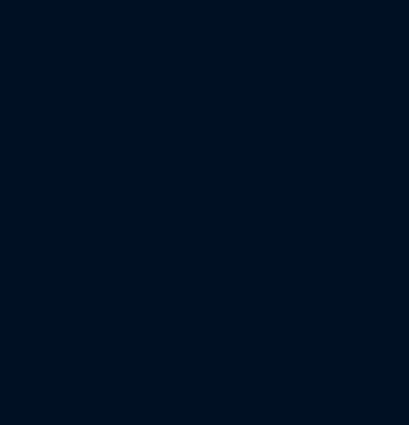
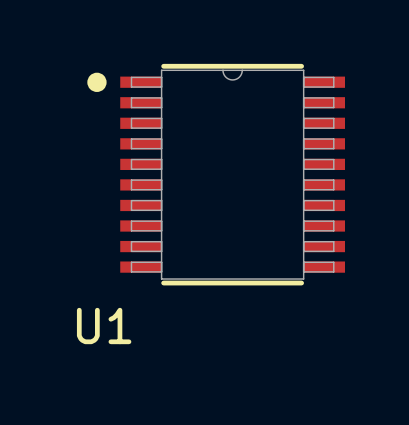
U1: none -> (216, 174)

